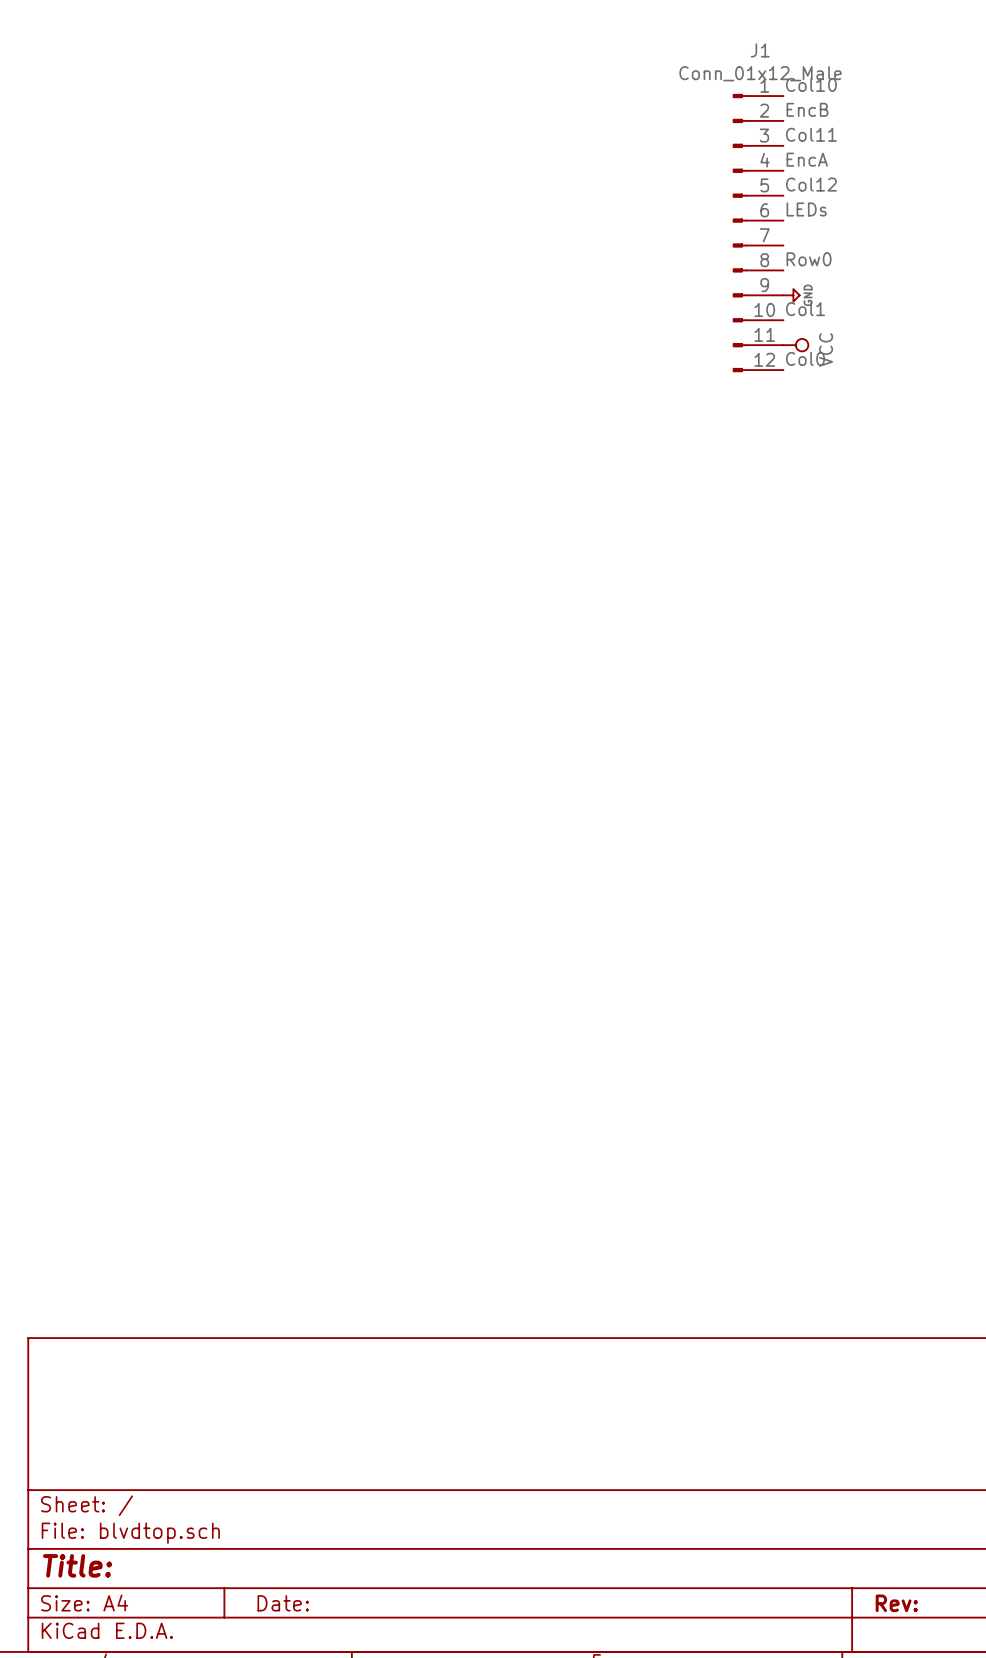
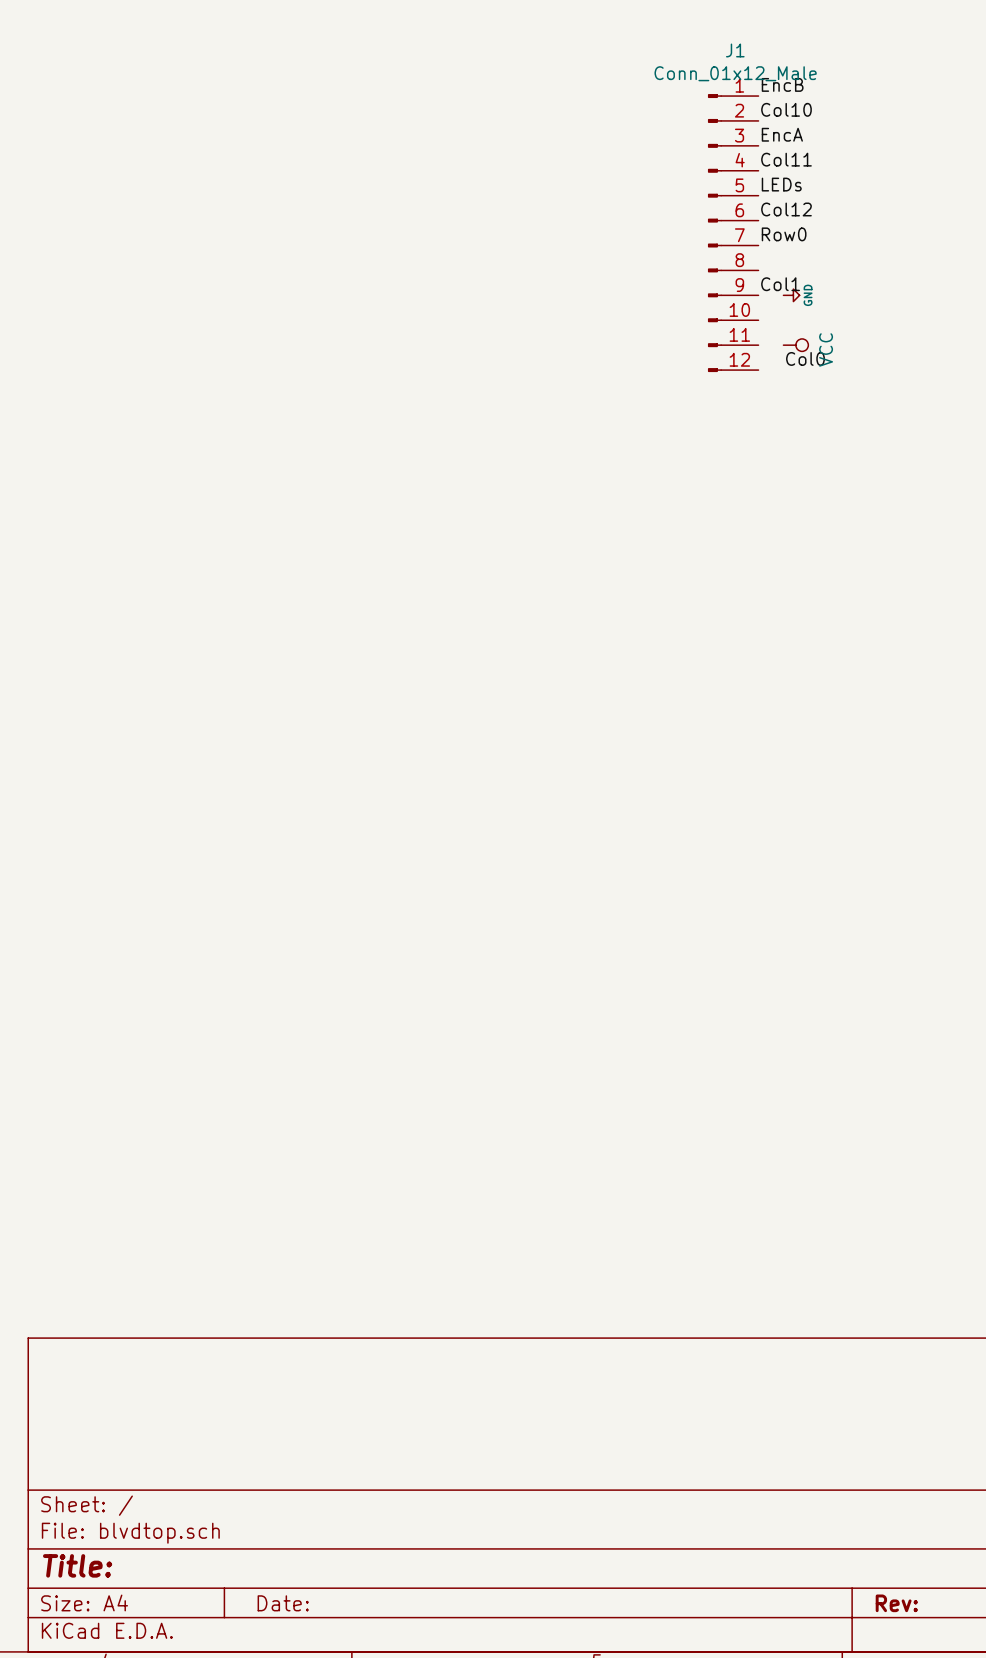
label position: Col10 (811, 84) -> Col10 (786, 109)
label position: EncB (807, 109) -> EncB (782, 84)
label position: Col11 (811, 134) -> Col11 (786, 159)
label position: EncA (807, 159) -> EncA (782, 134)
label position: Col12 (811, 184) -> Col12 (786, 209)
label position: LEDs (806, 209) -> LEDs (781, 184)
J1 position: (758, 233) -> (733, 233)
label position: Row0 (809, 259) -> Row0 (784, 234)
label position: Col1 (805, 309) -> Col1 (780, 284)

